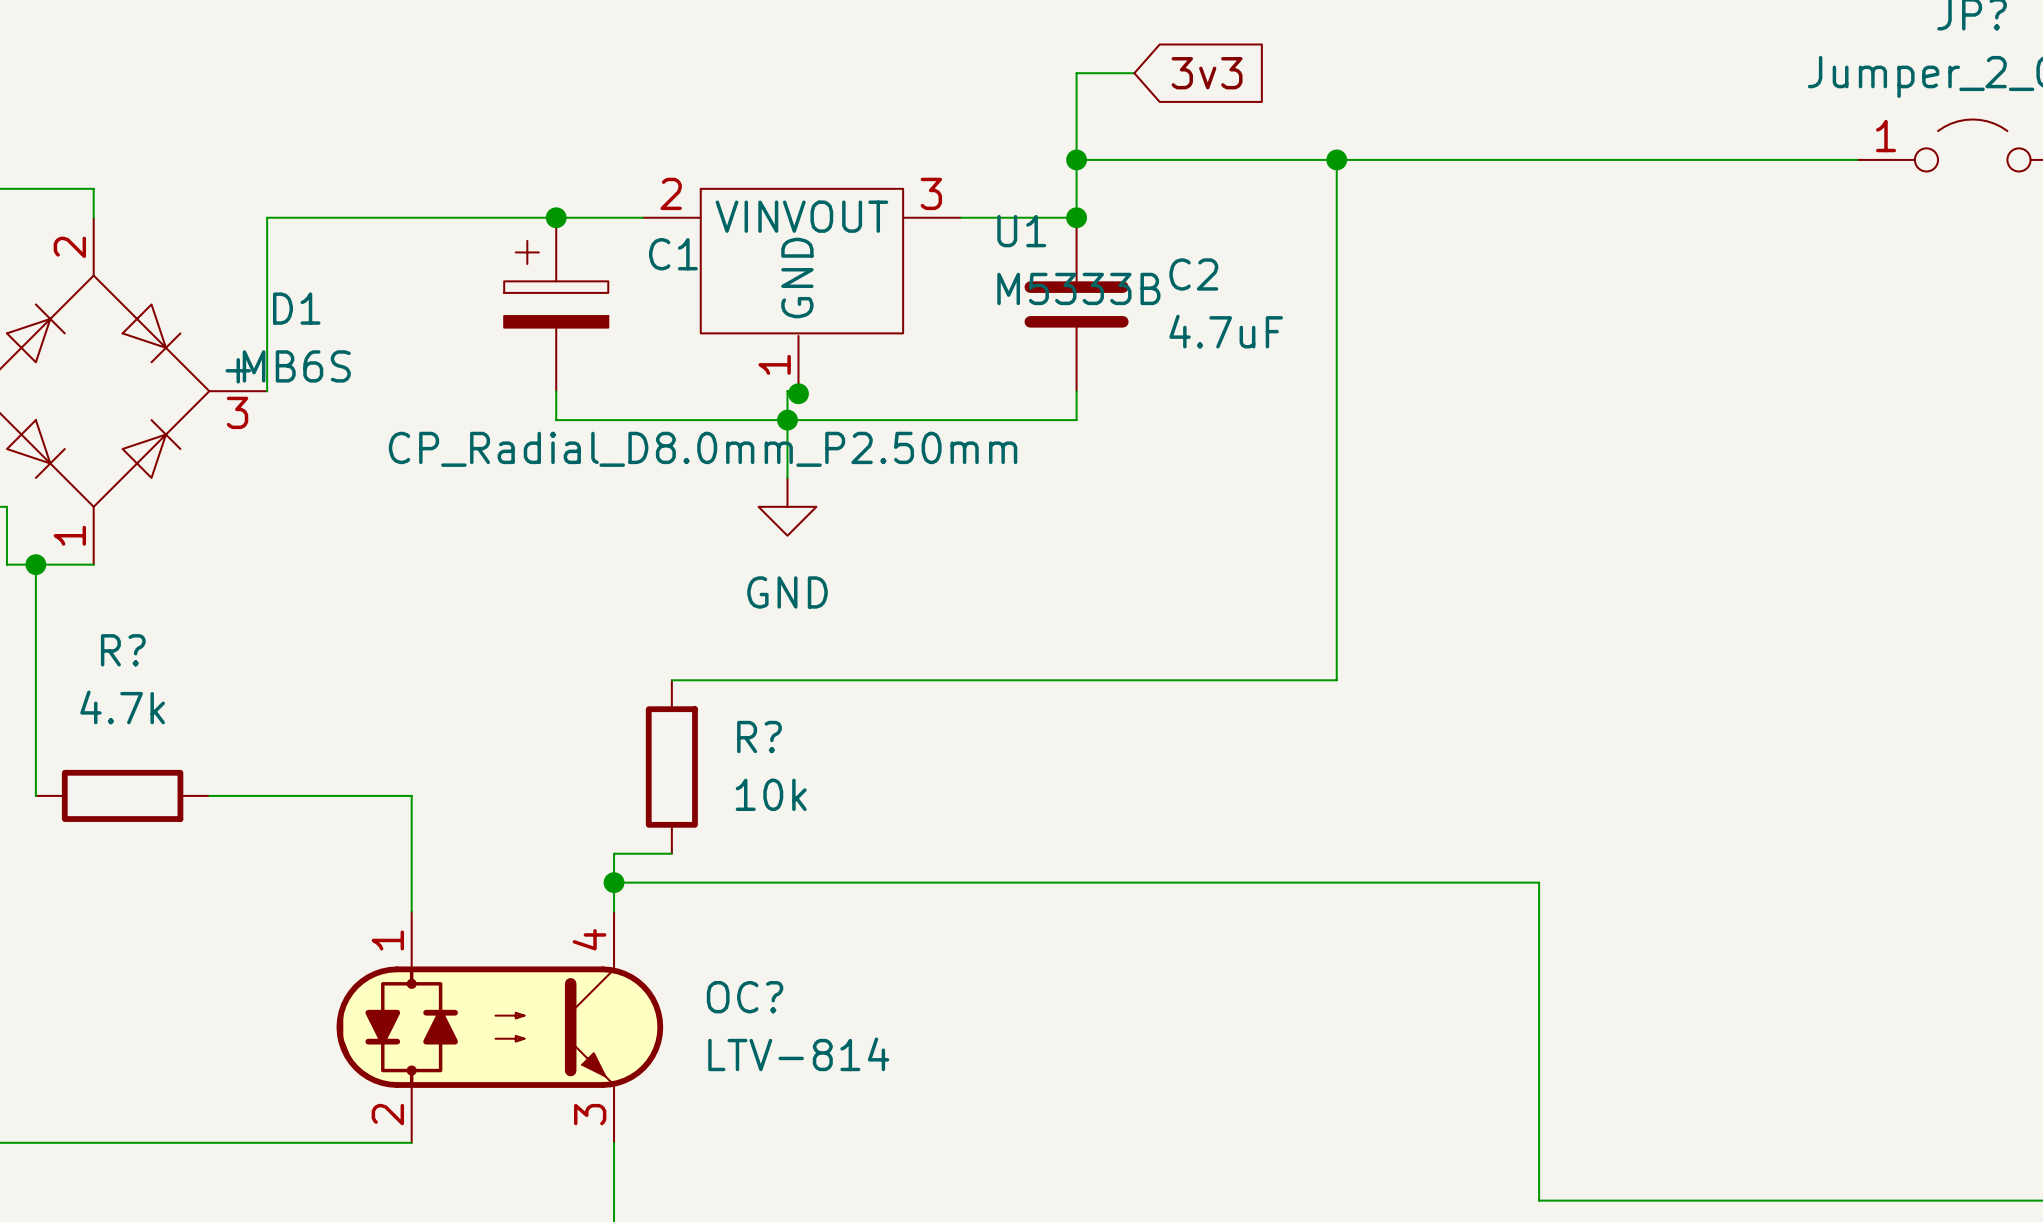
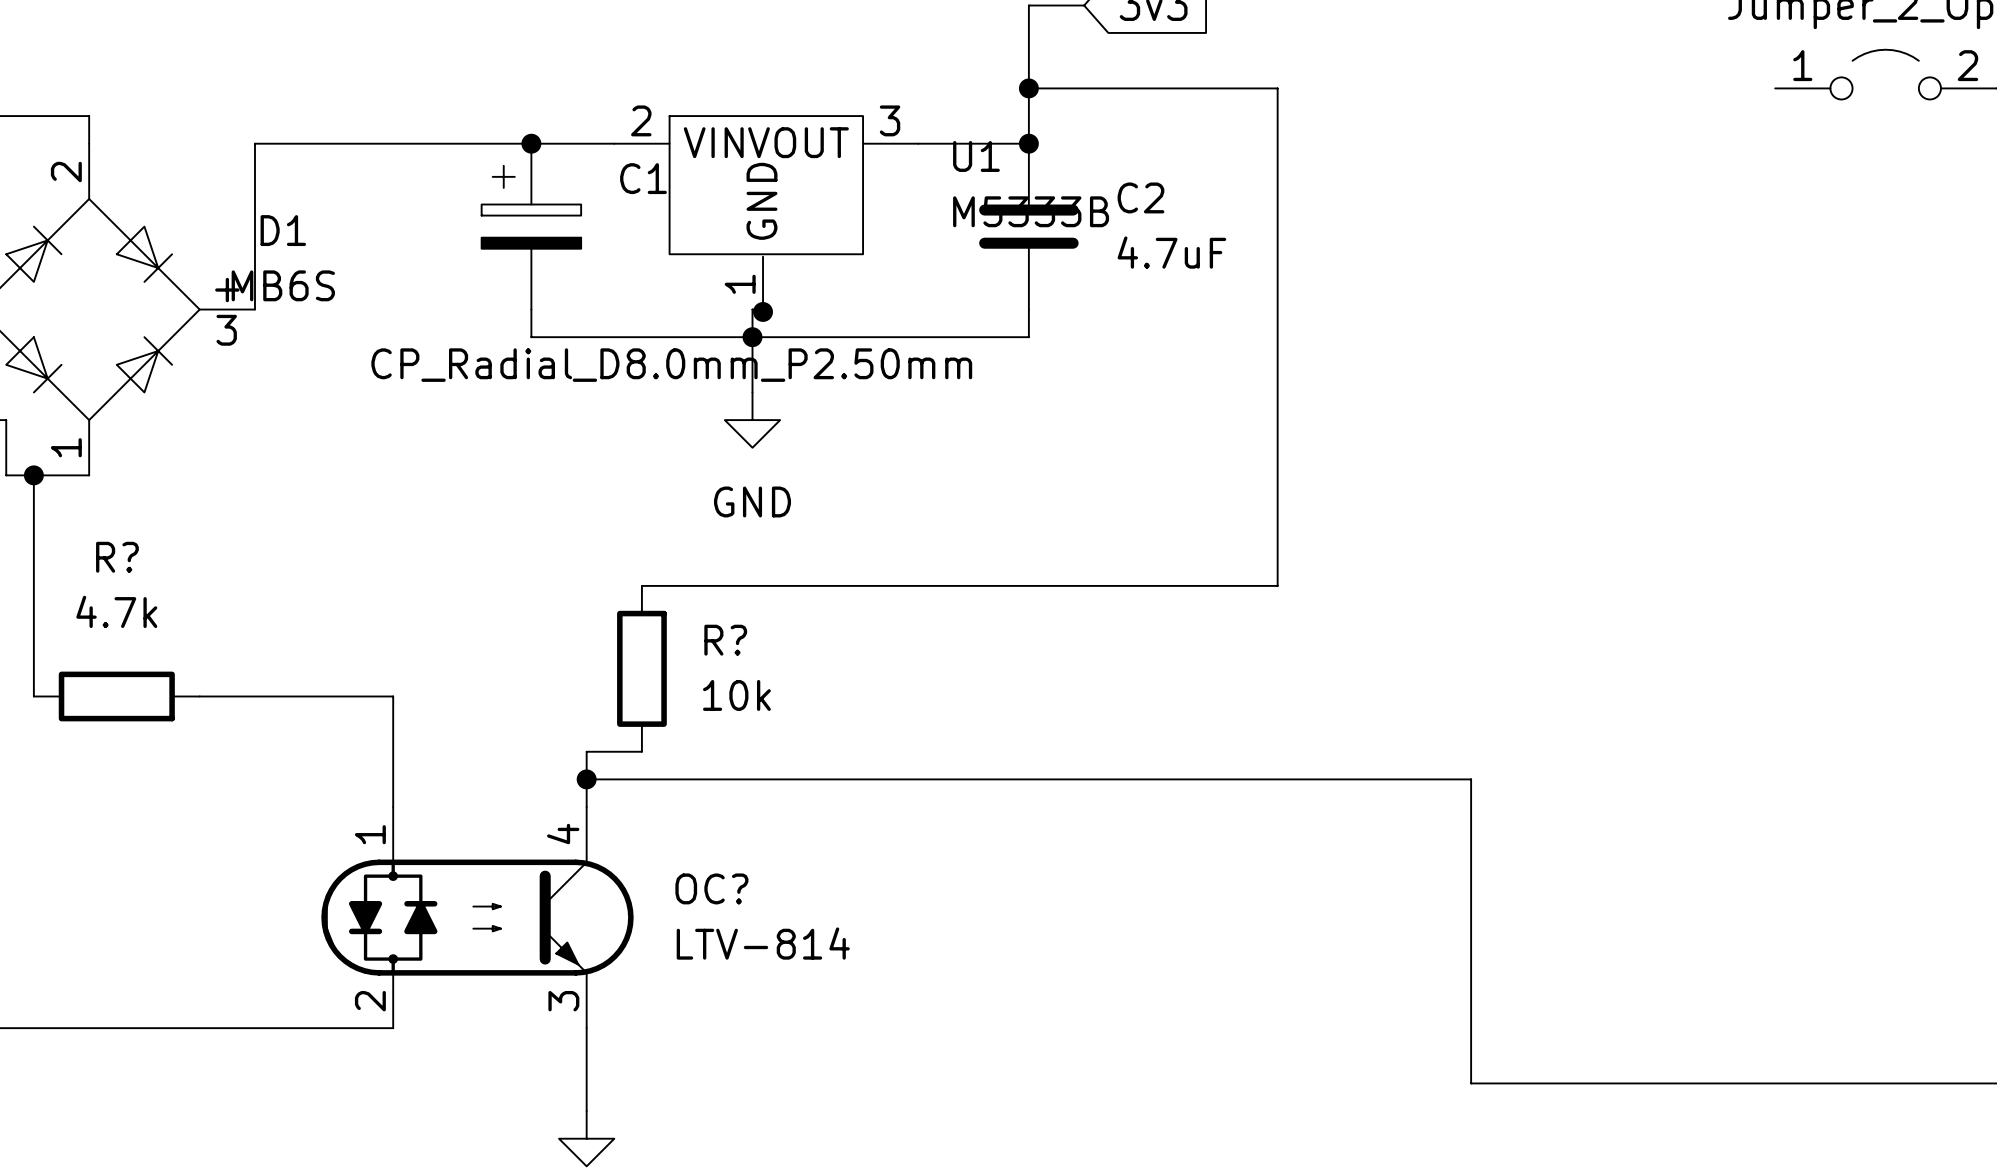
wire: (1336, 159) (1857, 159) -> none
junction: (1336, 159) -> none

